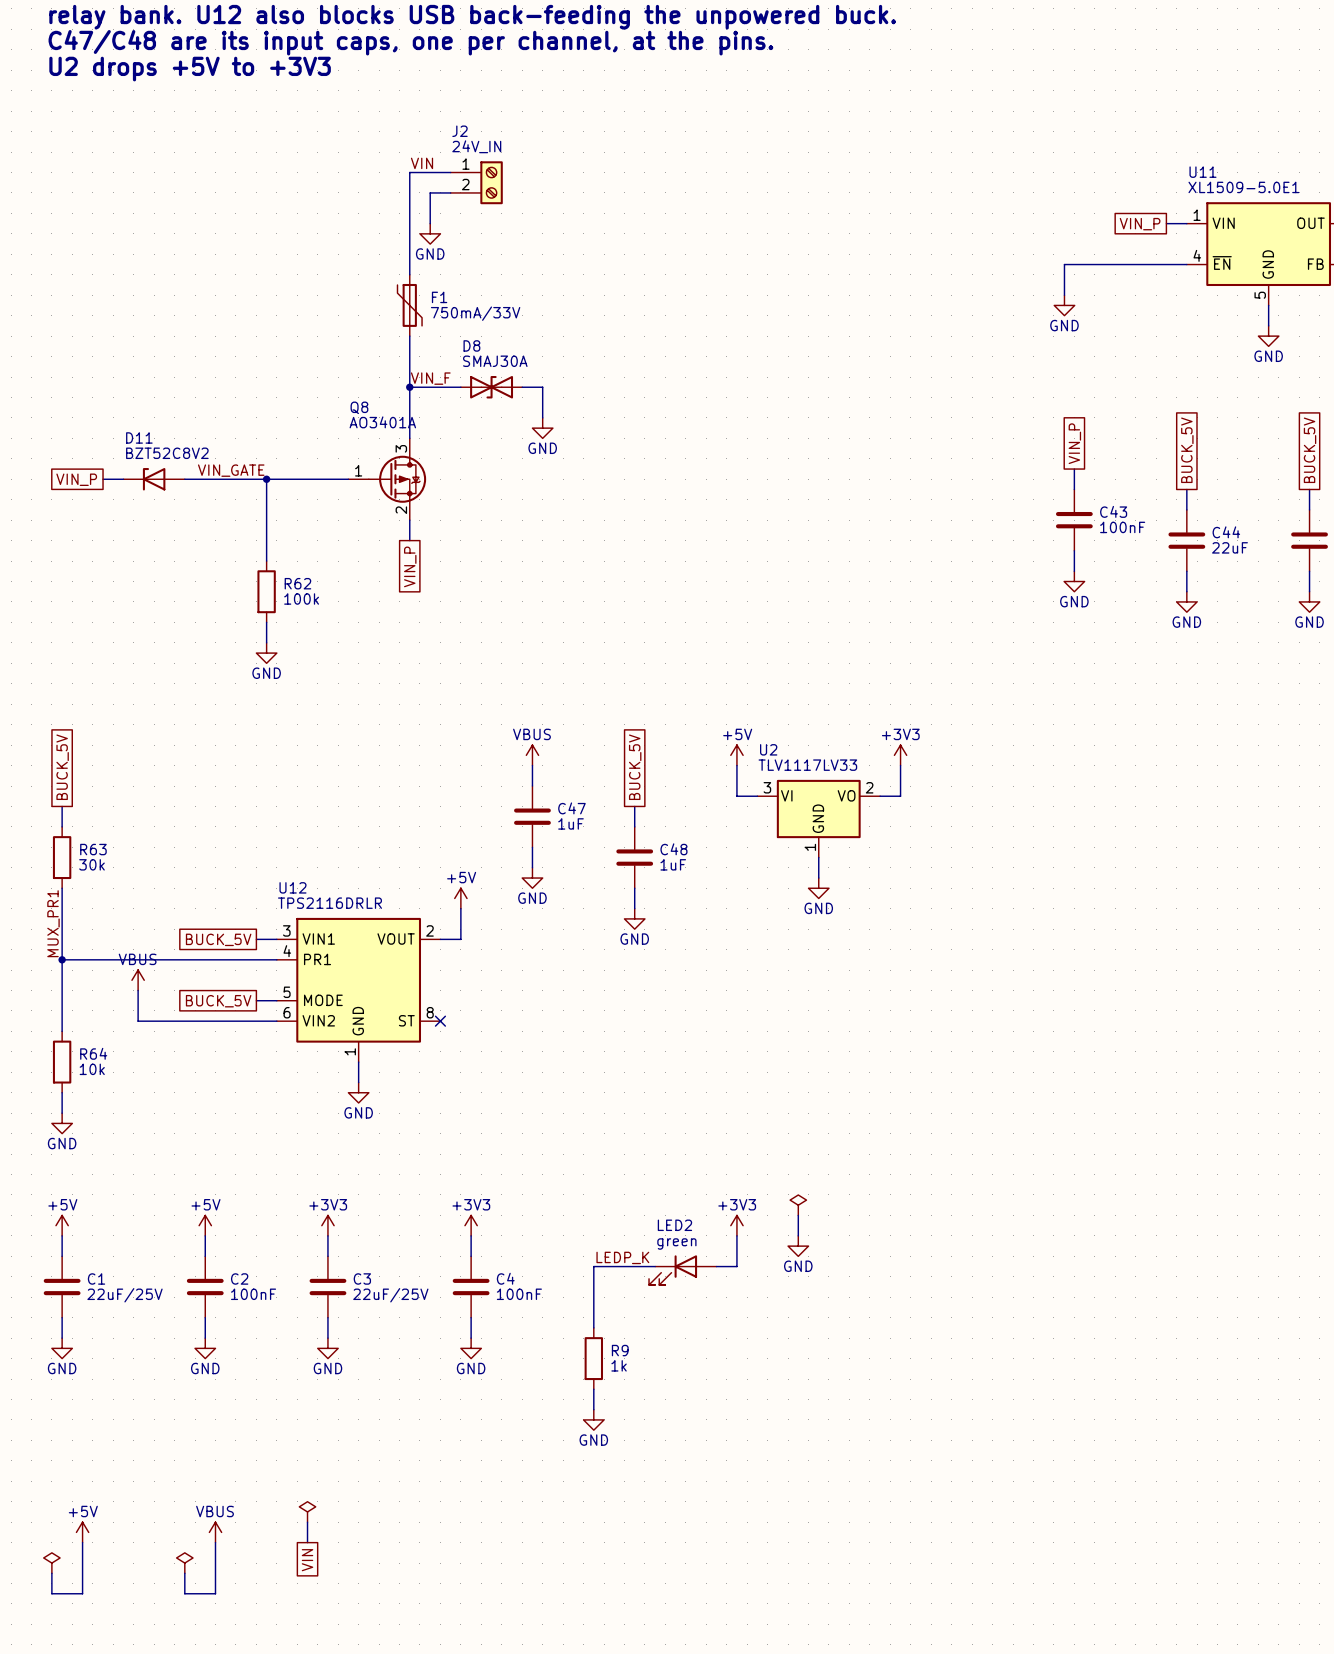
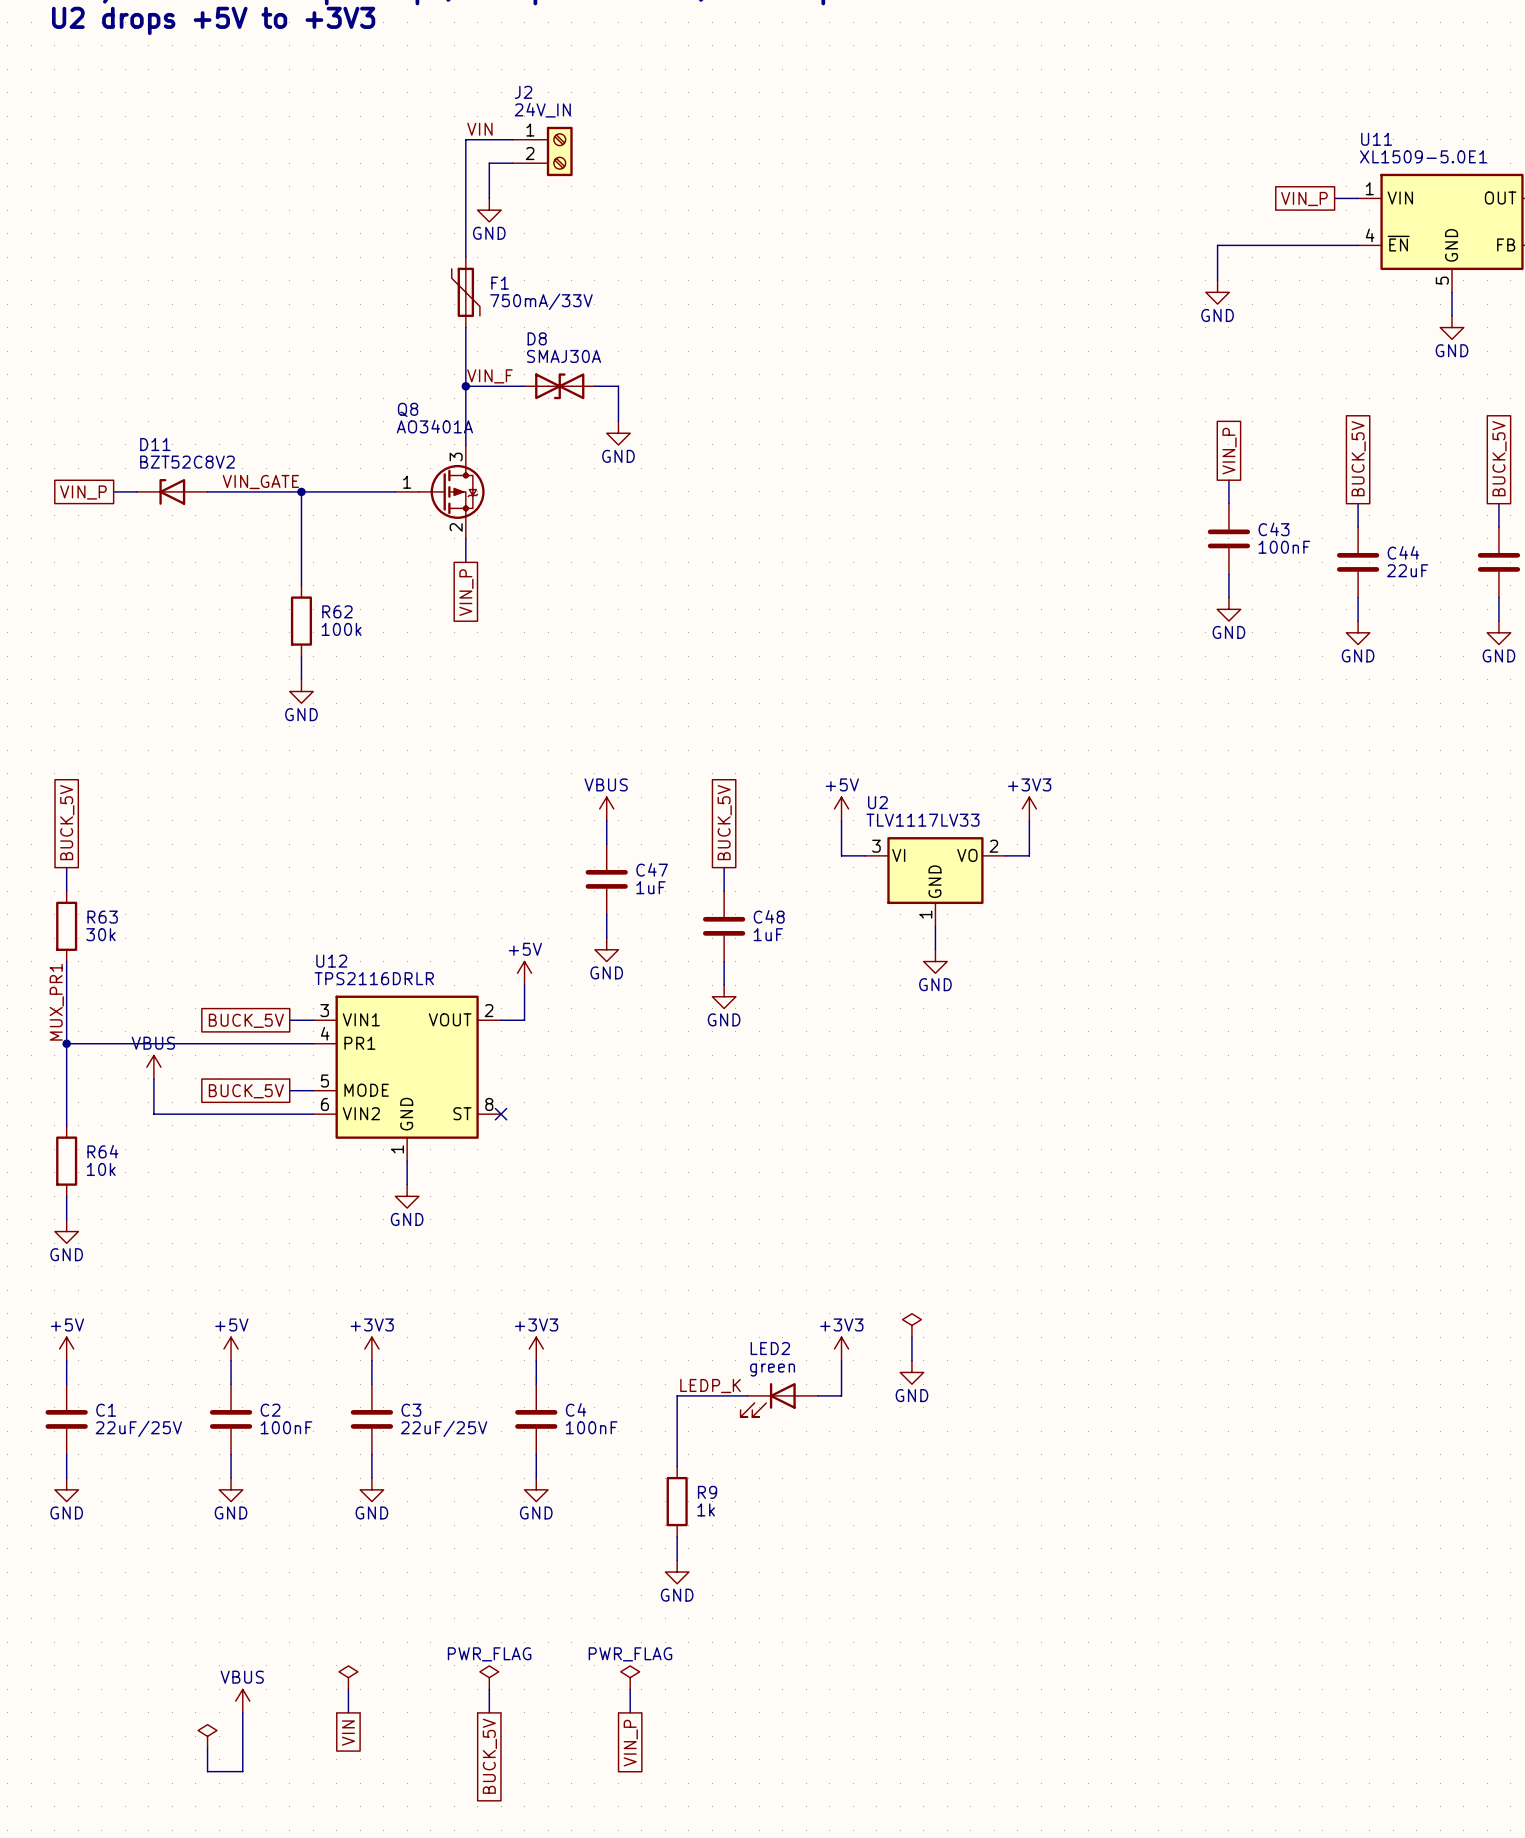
power symbol: none -> PWR_FLAG (489, 1677)
power symbol: none -> PWR_FLAG (630, 1677)
wire: none -> (489, 1689) (489, 1712)
wire: none -> (630, 1689) (630, 1712)
power symbol: +5V (82, 1532) -> none
wire: (82, 1542) (82, 1593) (51, 1593) (51, 1573) -> none
power symbol: (51, 1563) -> none
global label: none -> VIN_P (630, 1743)
global label: none -> BUCK_5V (489, 1756)

